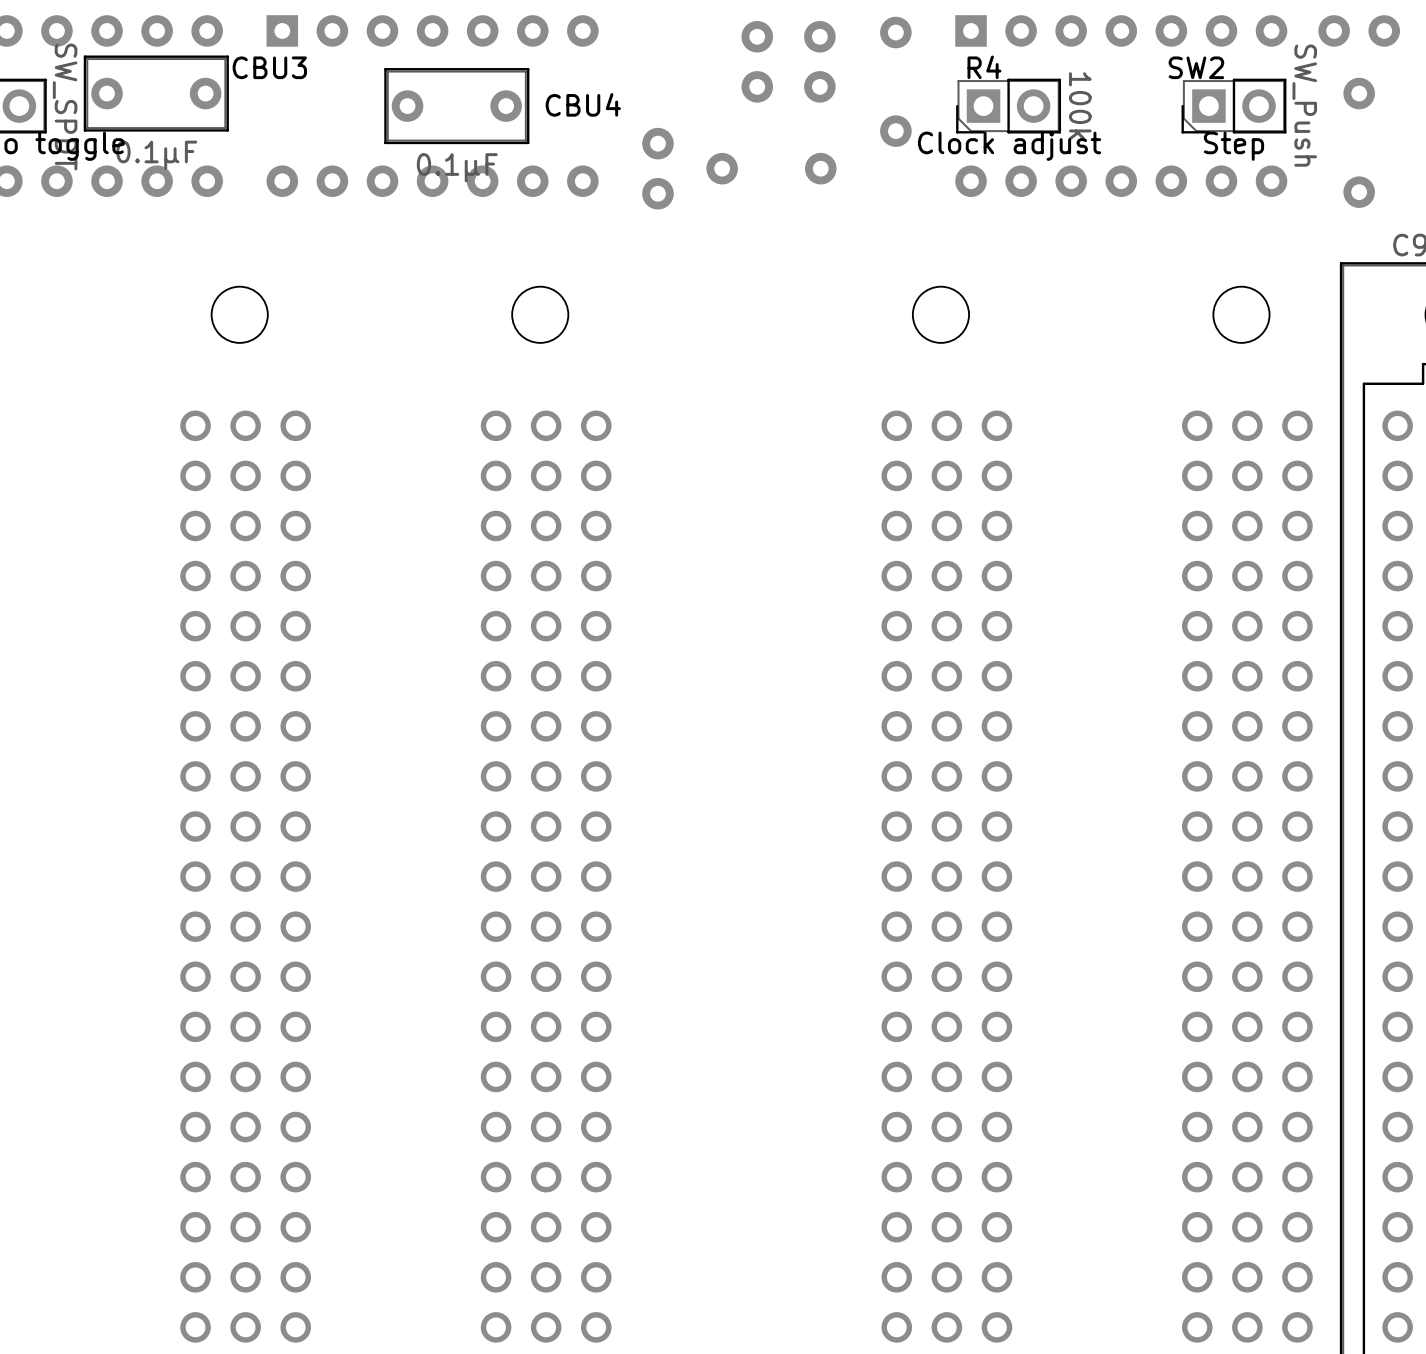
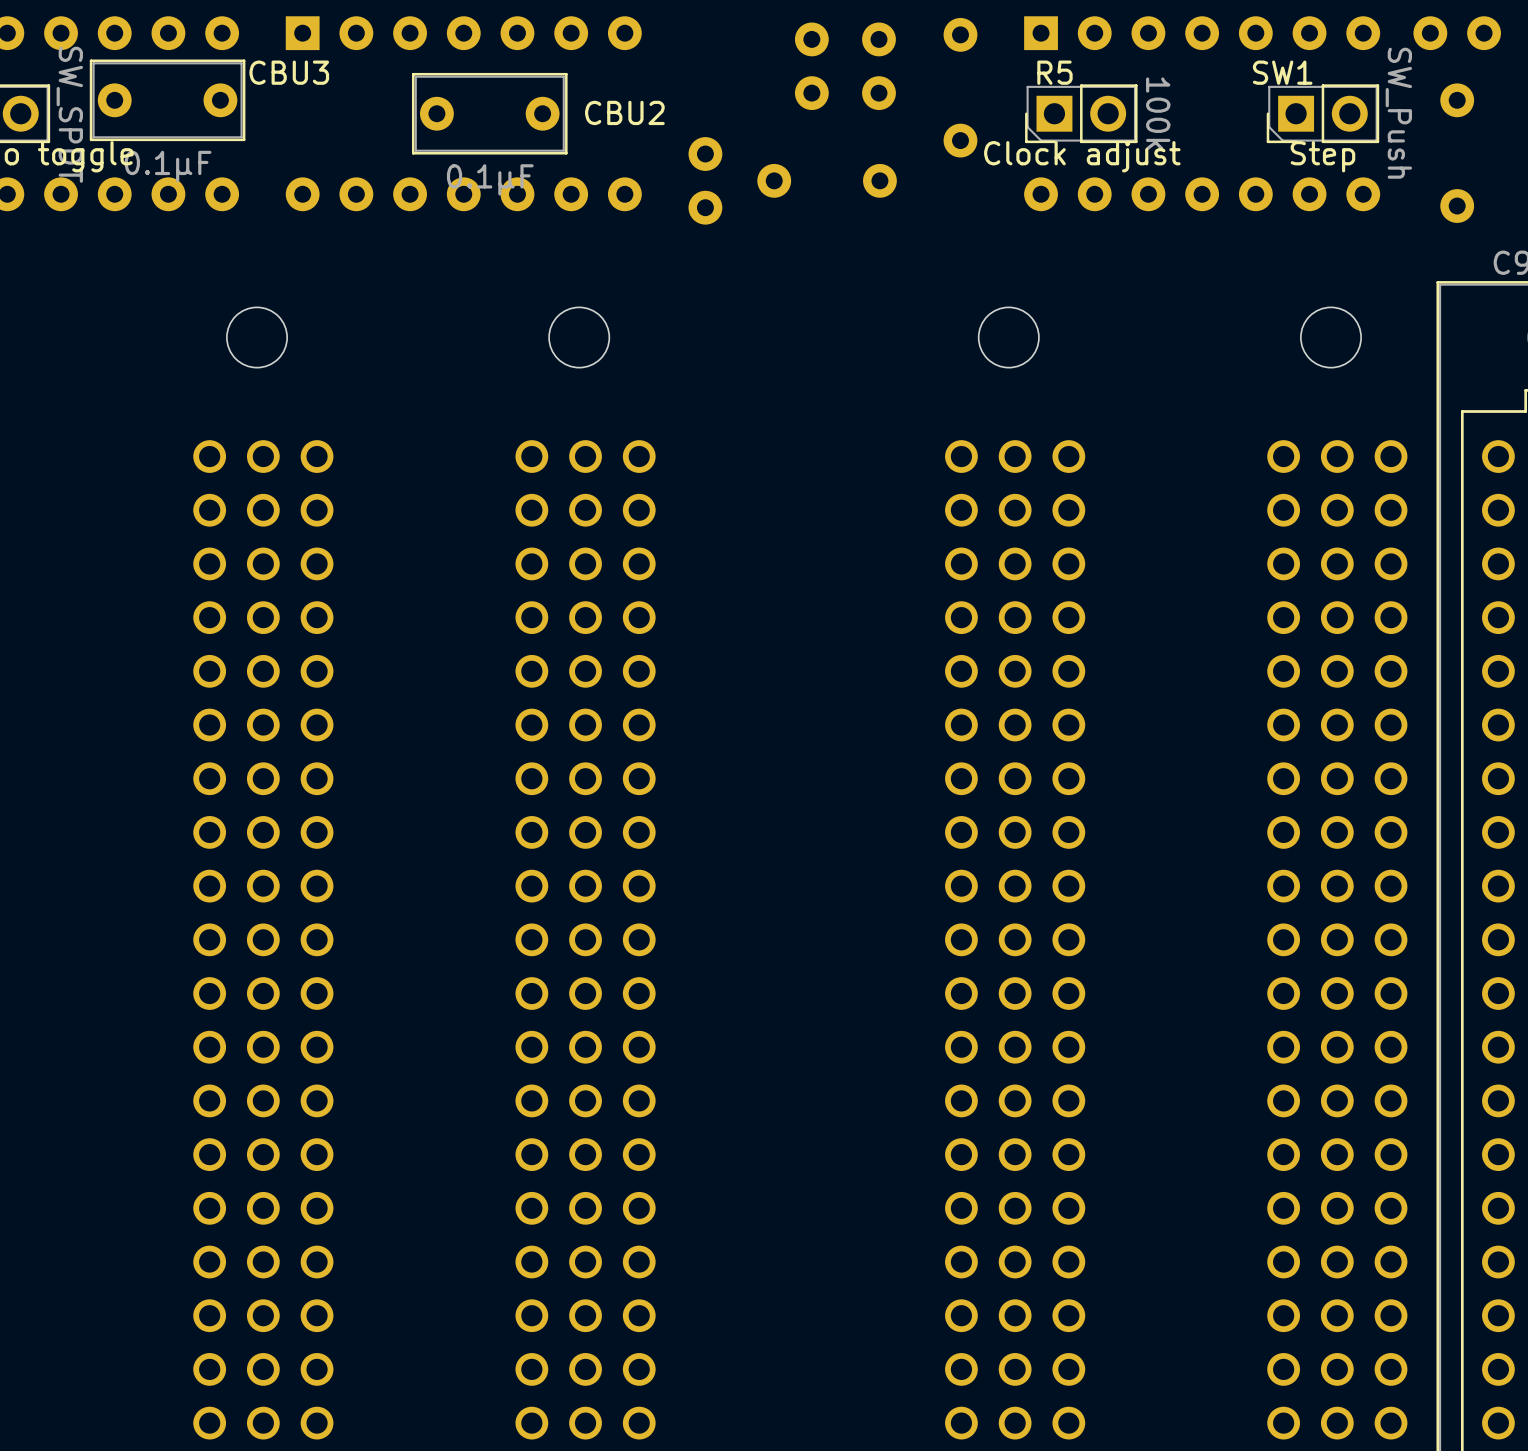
R4 name: R4 (984, 67) -> R5 (1054, 72)
SW2 name: SW2 (1196, 67) -> SW1 (1282, 72)
CBU4 name: CBU4 (583, 104) -> CBU2 (624, 112)

